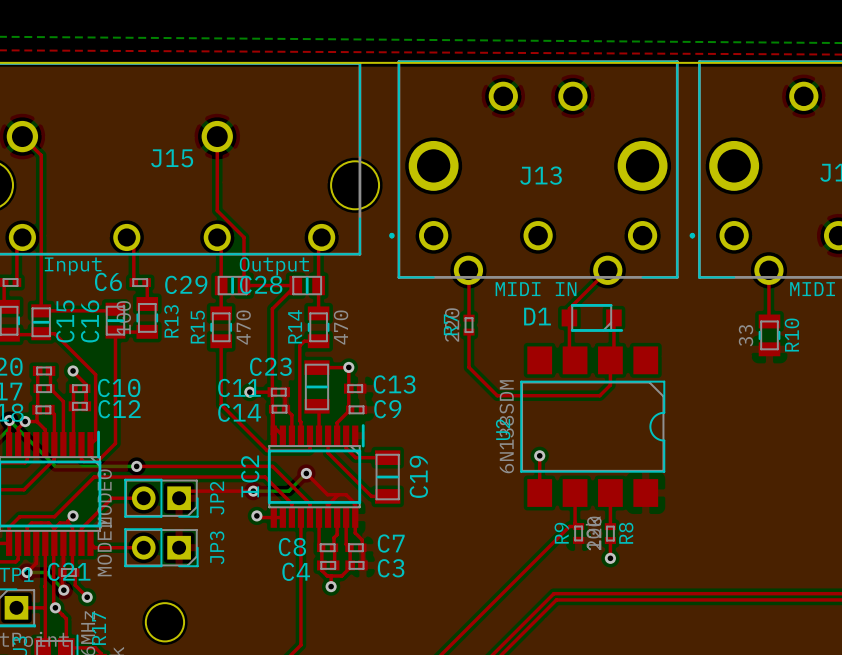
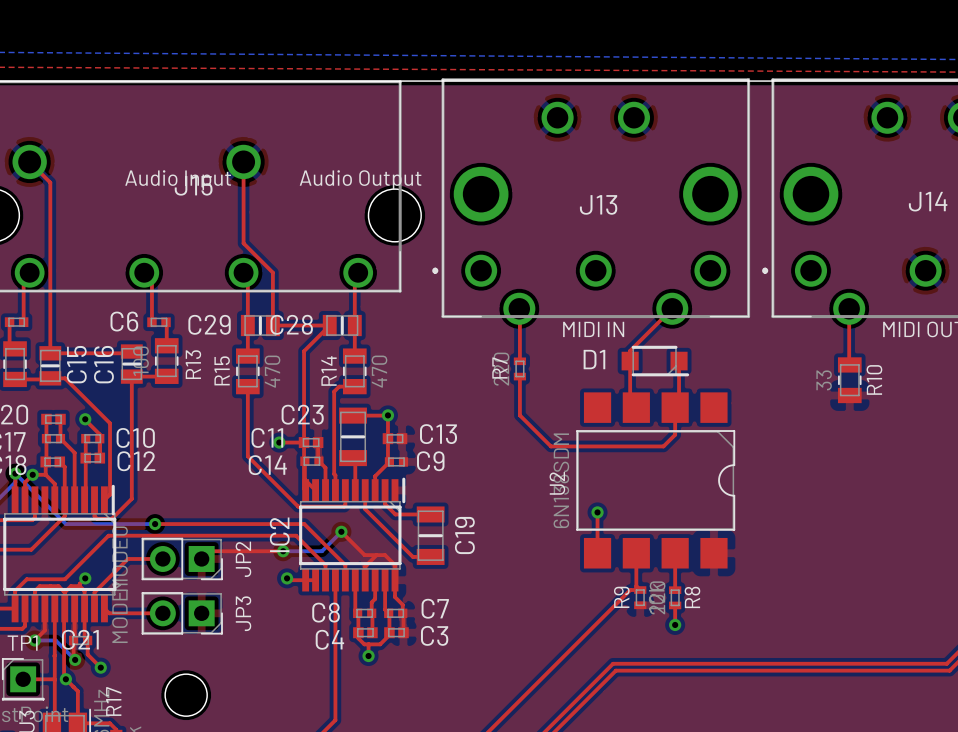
text: none -> Audio Input (178, 180)
text: none -> Audio Output (360, 180)
text: Input (73, 266) -> none
text: Output (274, 266) -> none

